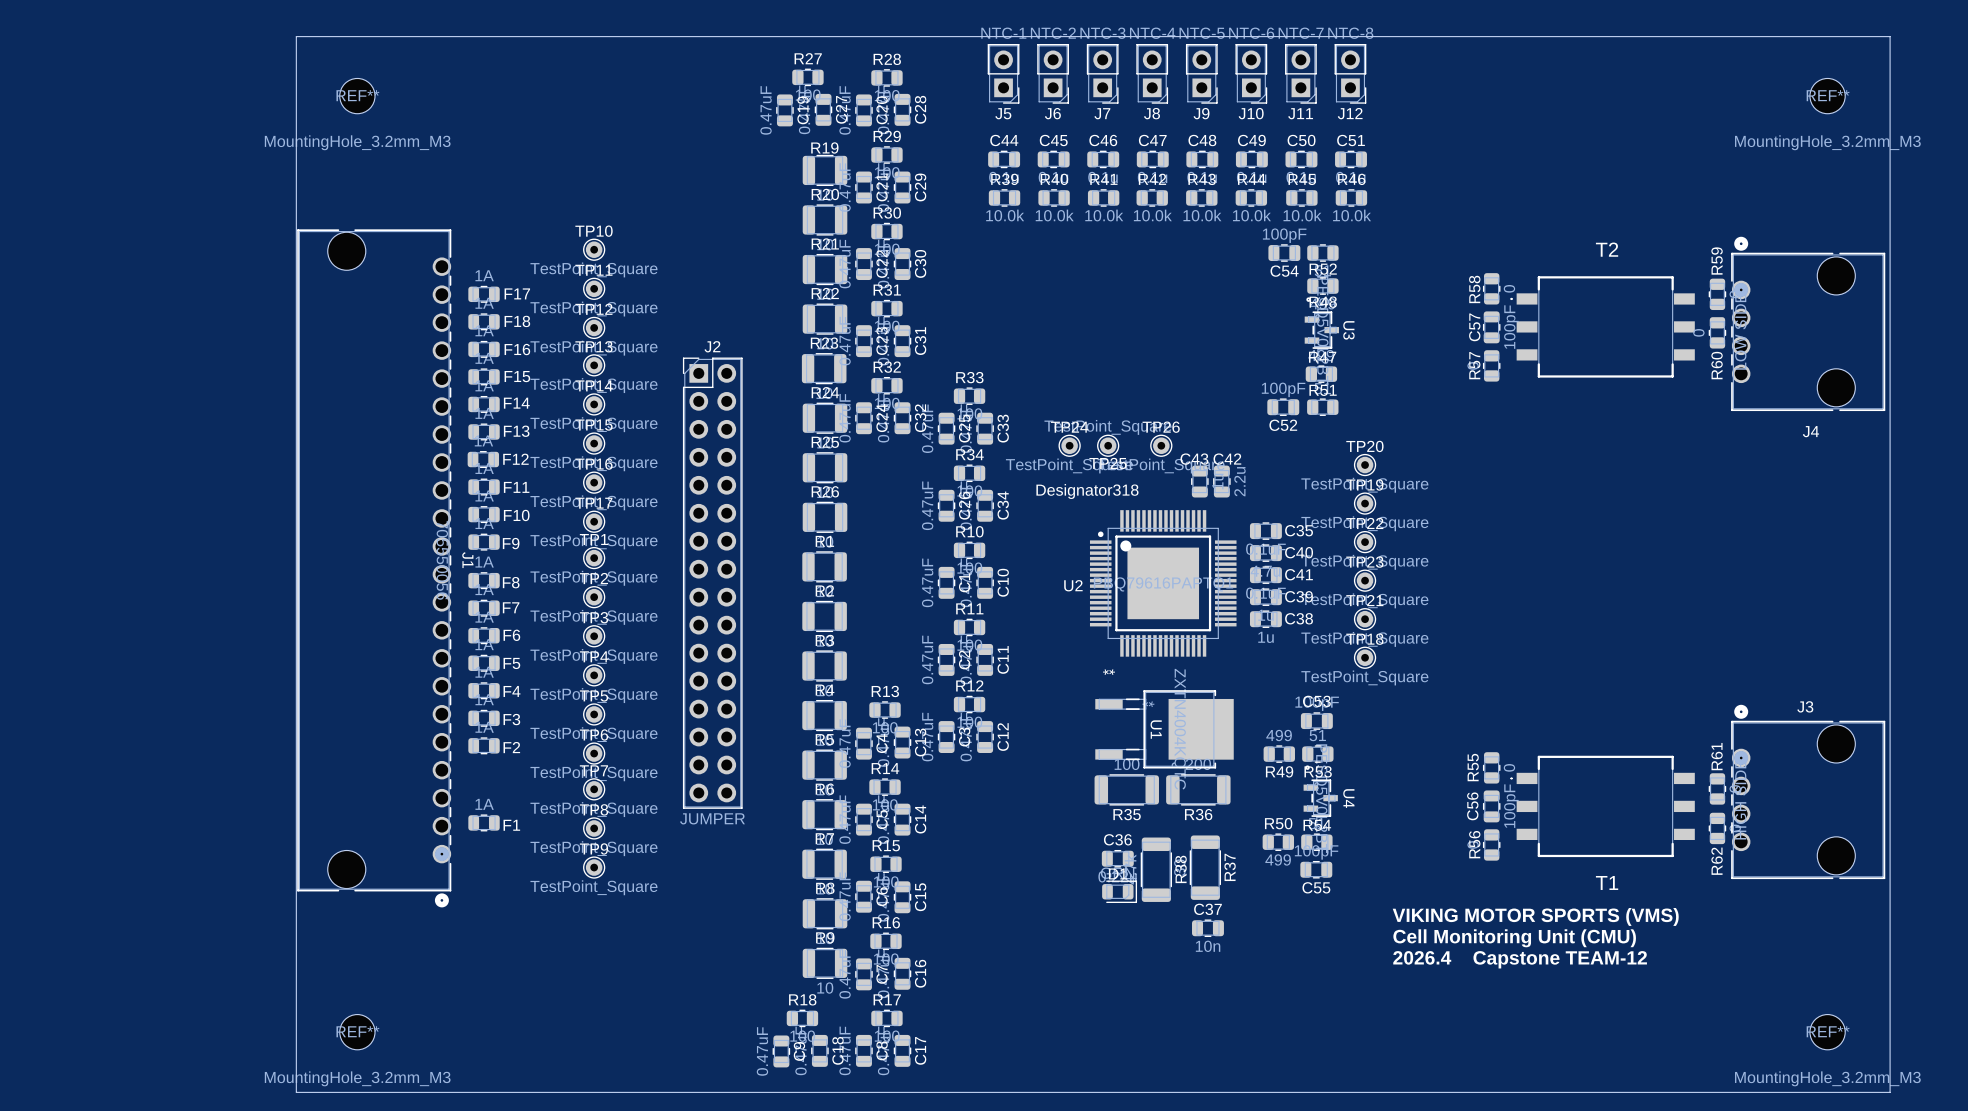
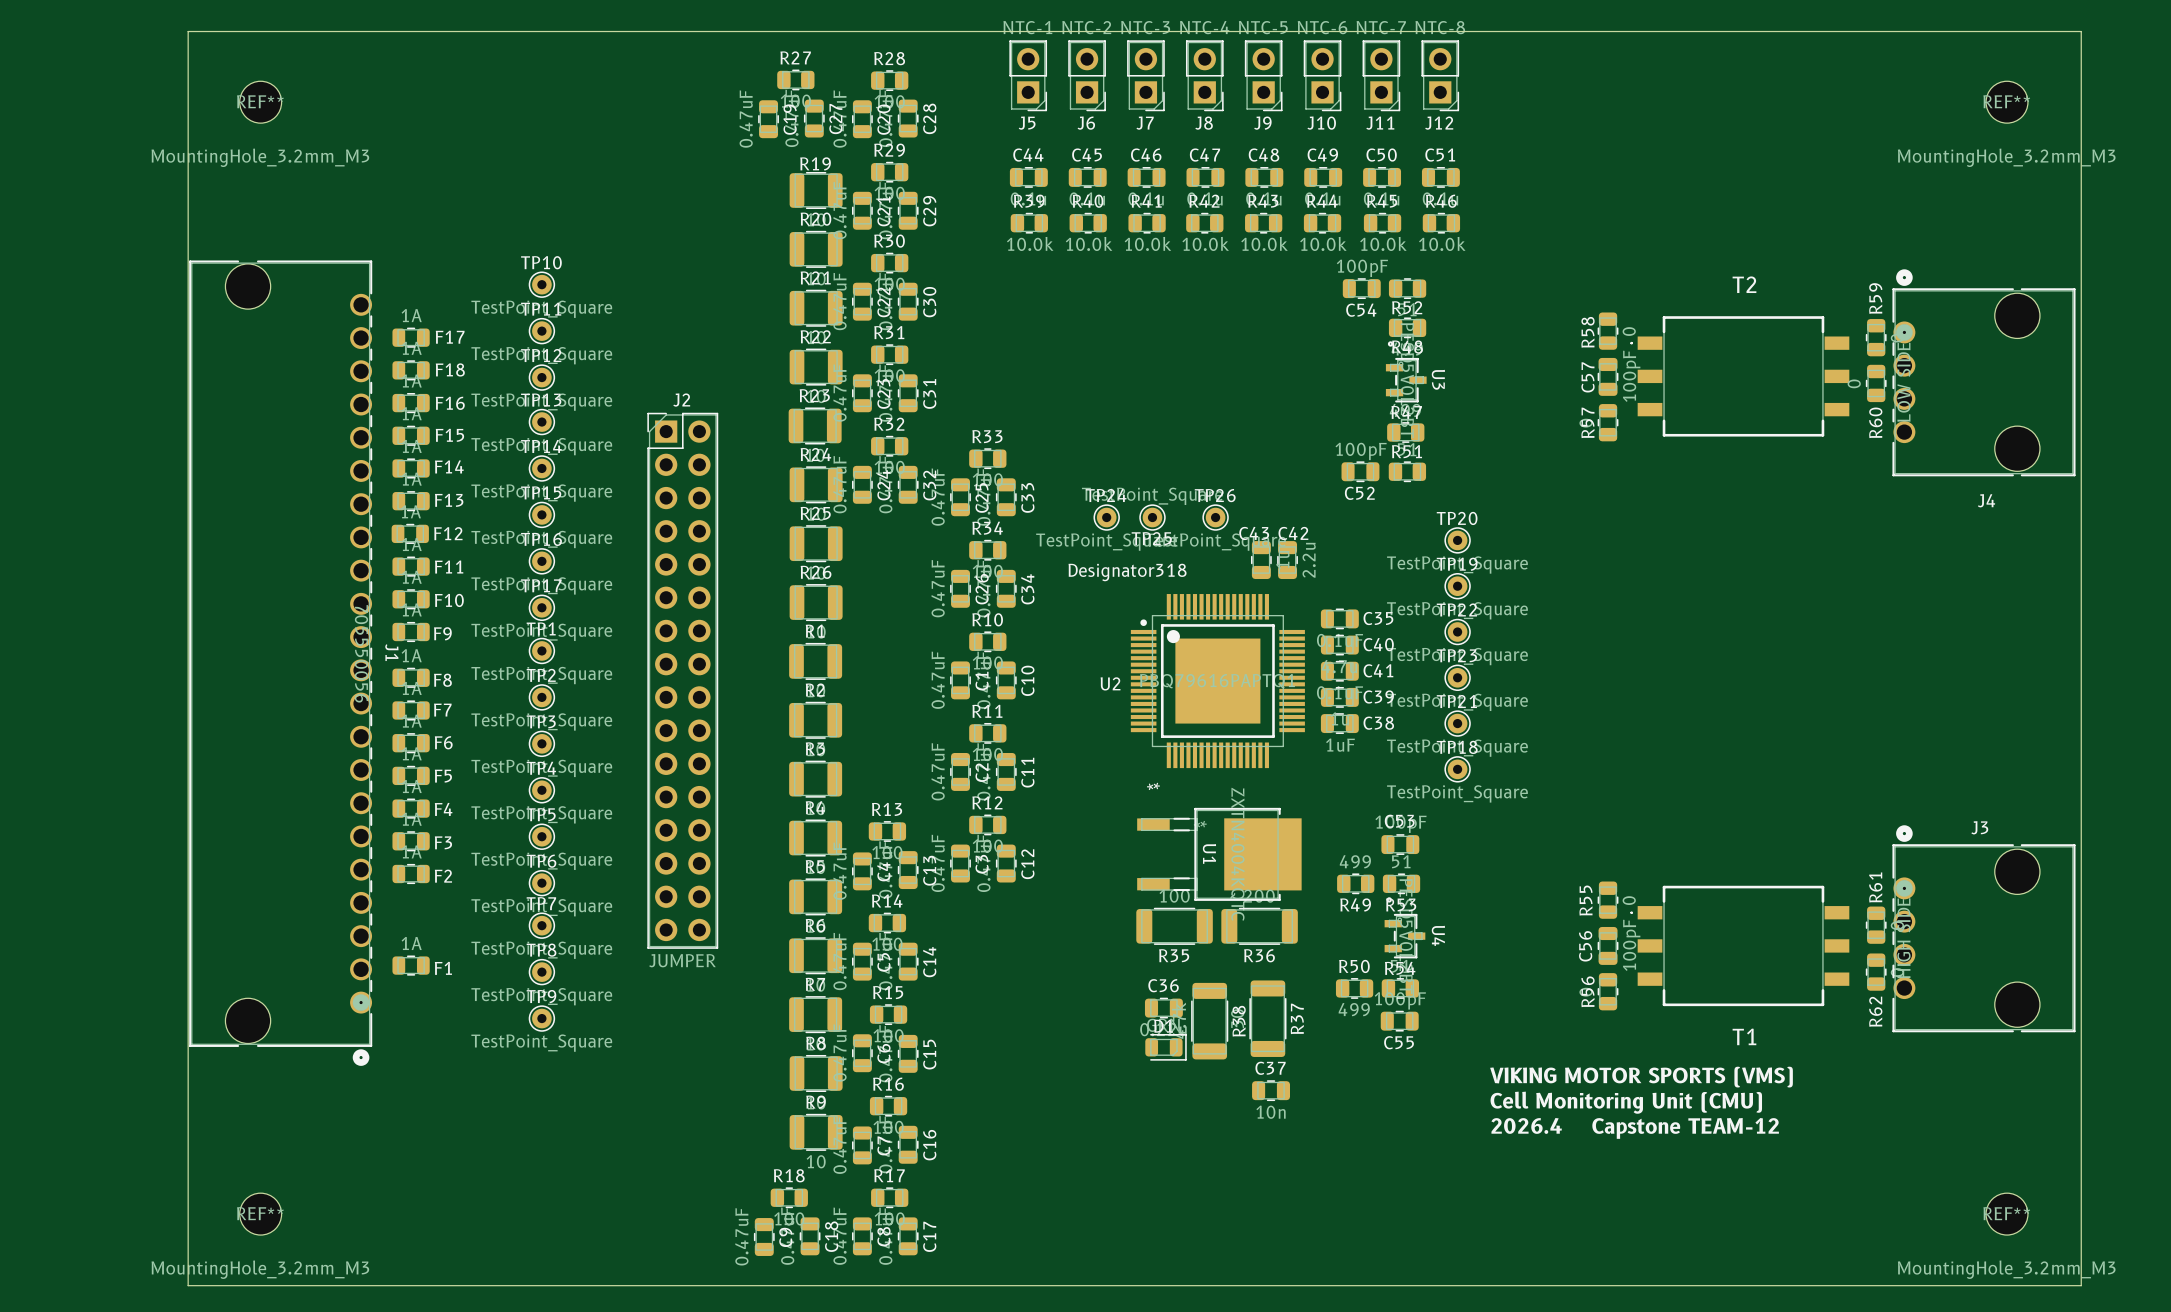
C38 value: 1u (1266, 637) -> 1uF (1340, 745)

